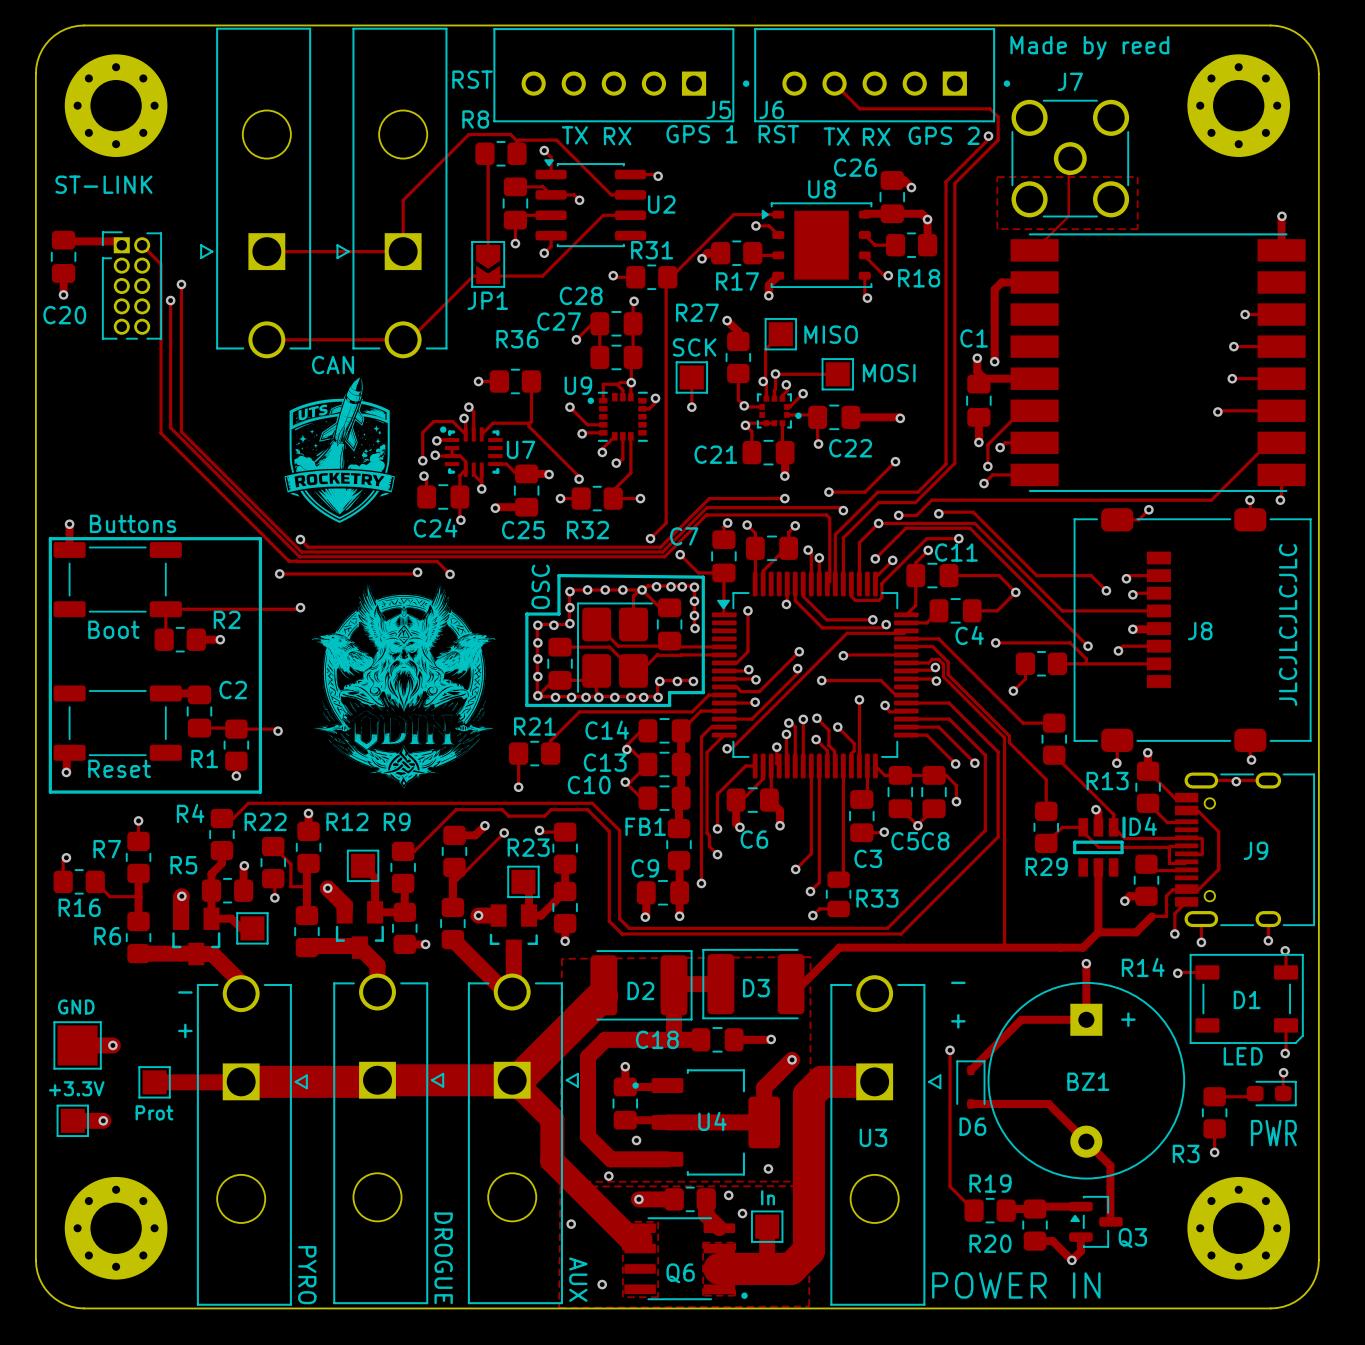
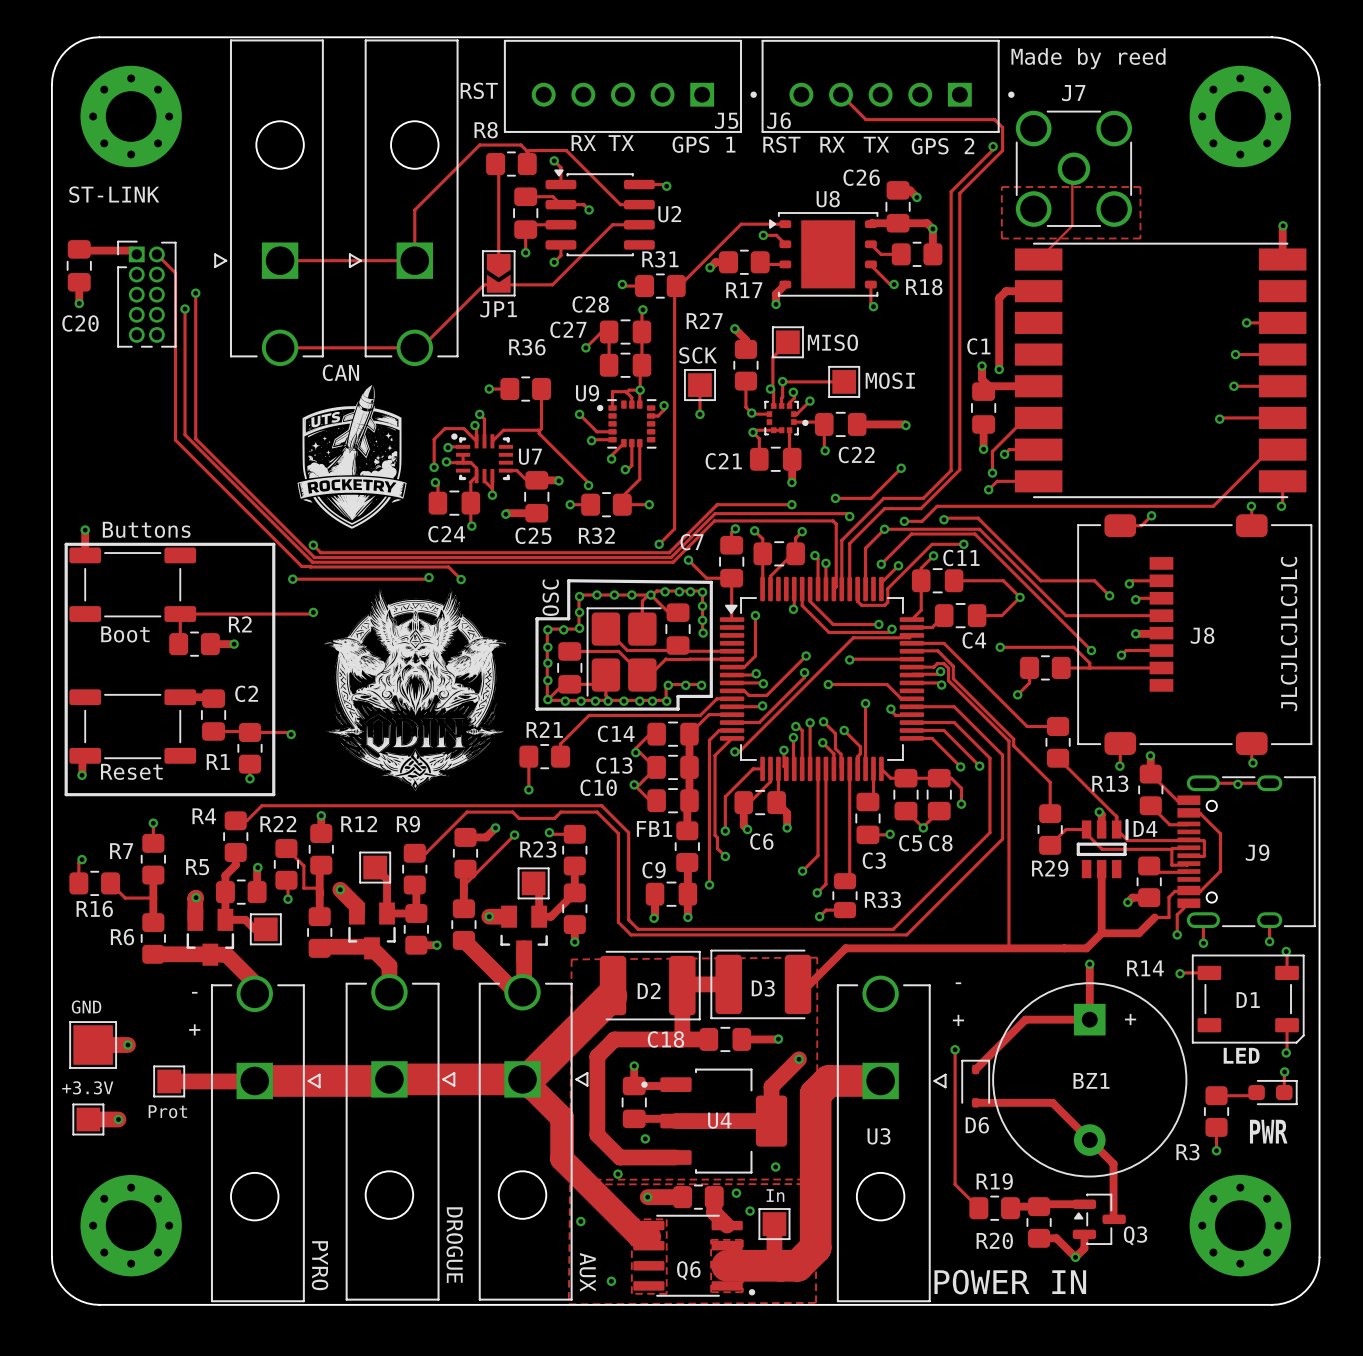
text: TX (574, 135) -> RX (583, 143)
text: RX (617, 136) -> TX (621, 143)
text: TX (836, 136) -> RX (832, 144)
text: RX (876, 136) -> TX (876, 144)

